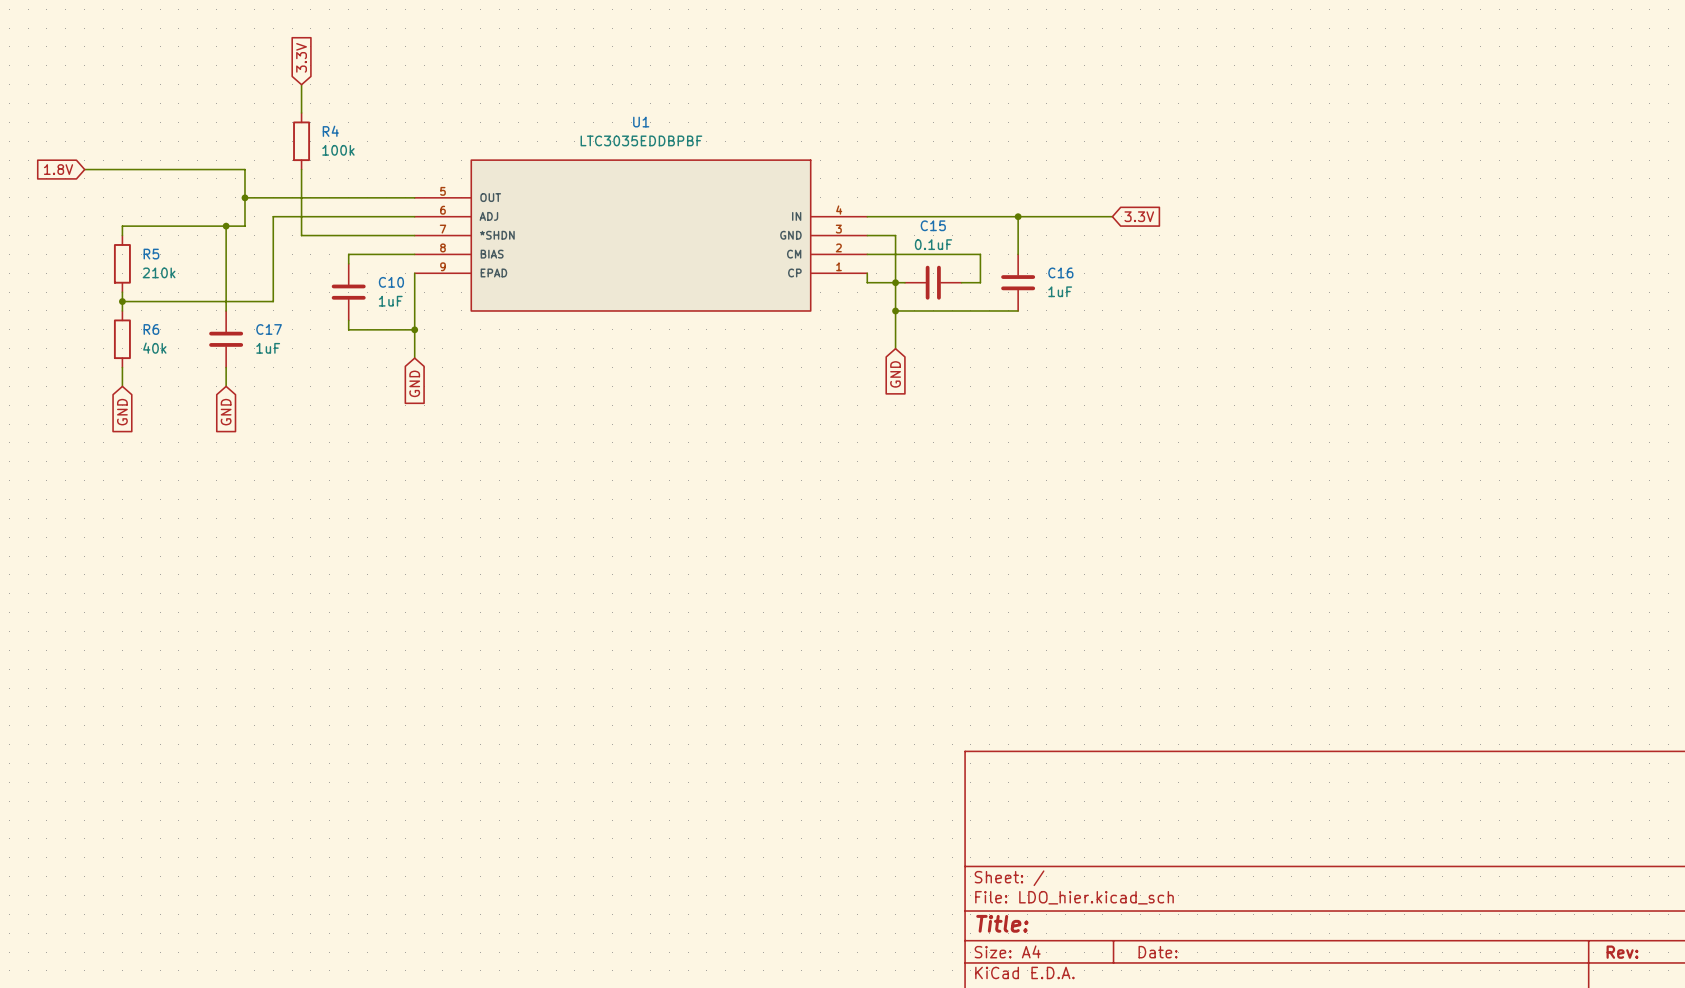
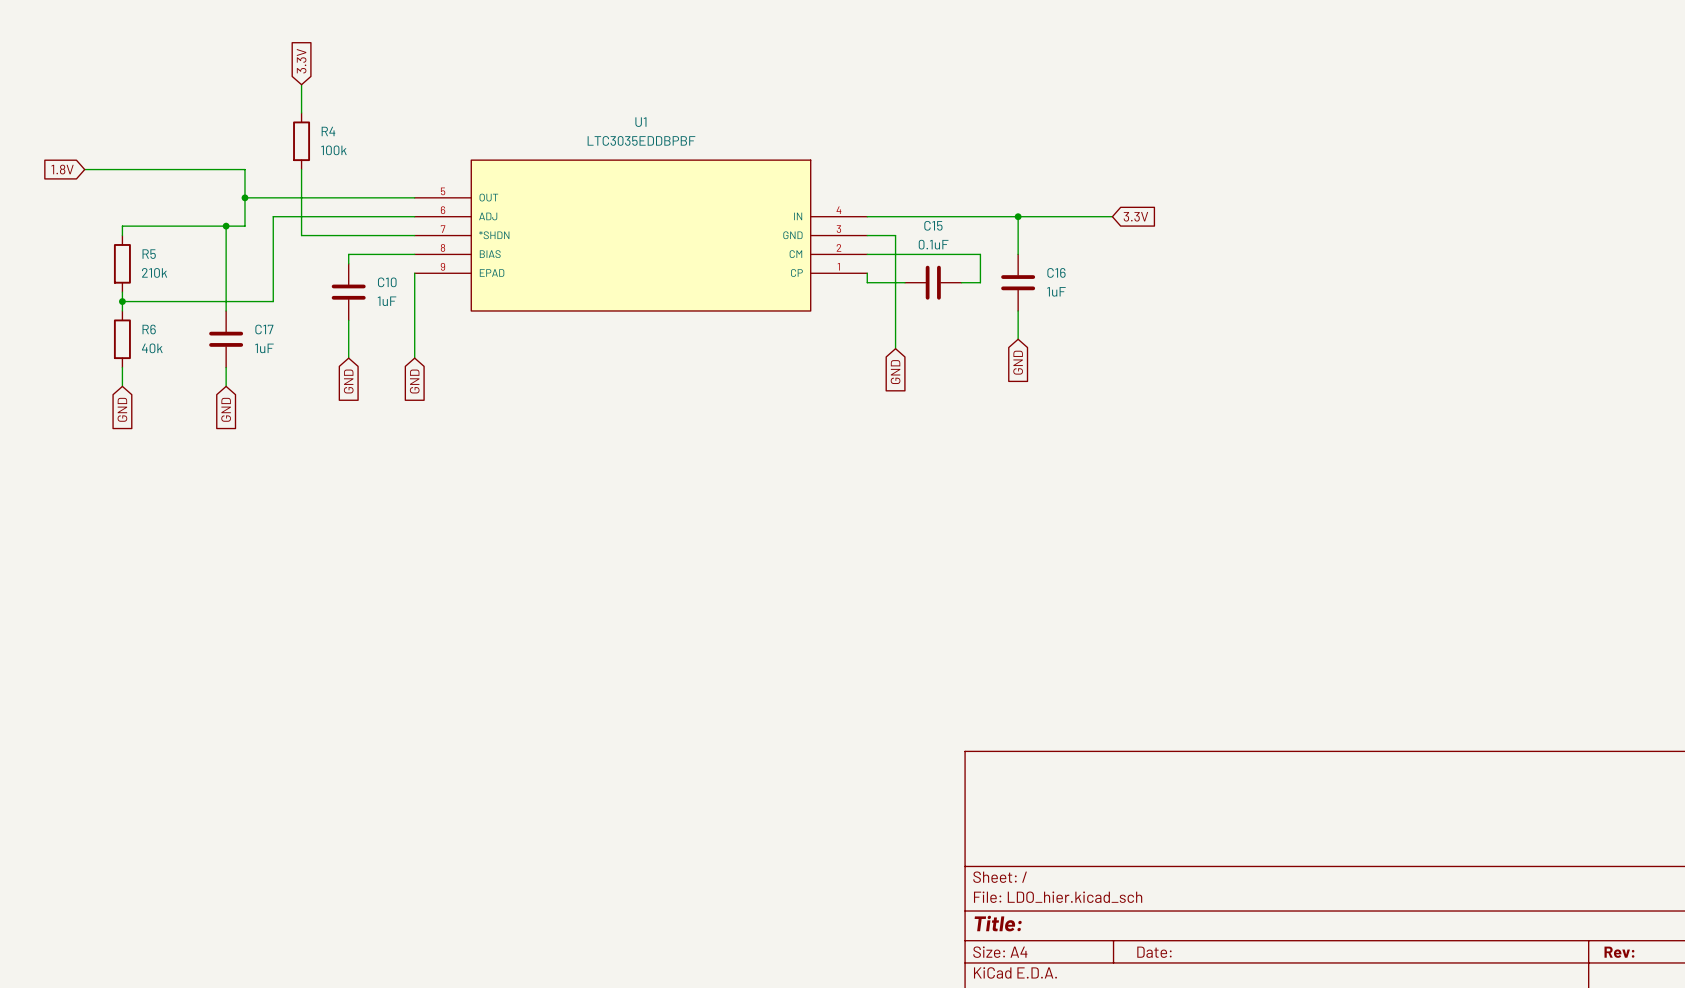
junction: (895, 282) -> none
wire: (895, 310) (1018, 310) -> (1018, 339) (1018, 310)
junction: (895, 310) -> none
wire: (348, 329) (414, 329) -> (348, 329) (348, 358)
junction: (414, 329) -> none
global label: none -> GND (1018, 362)
global label: none -> GND (348, 381)

